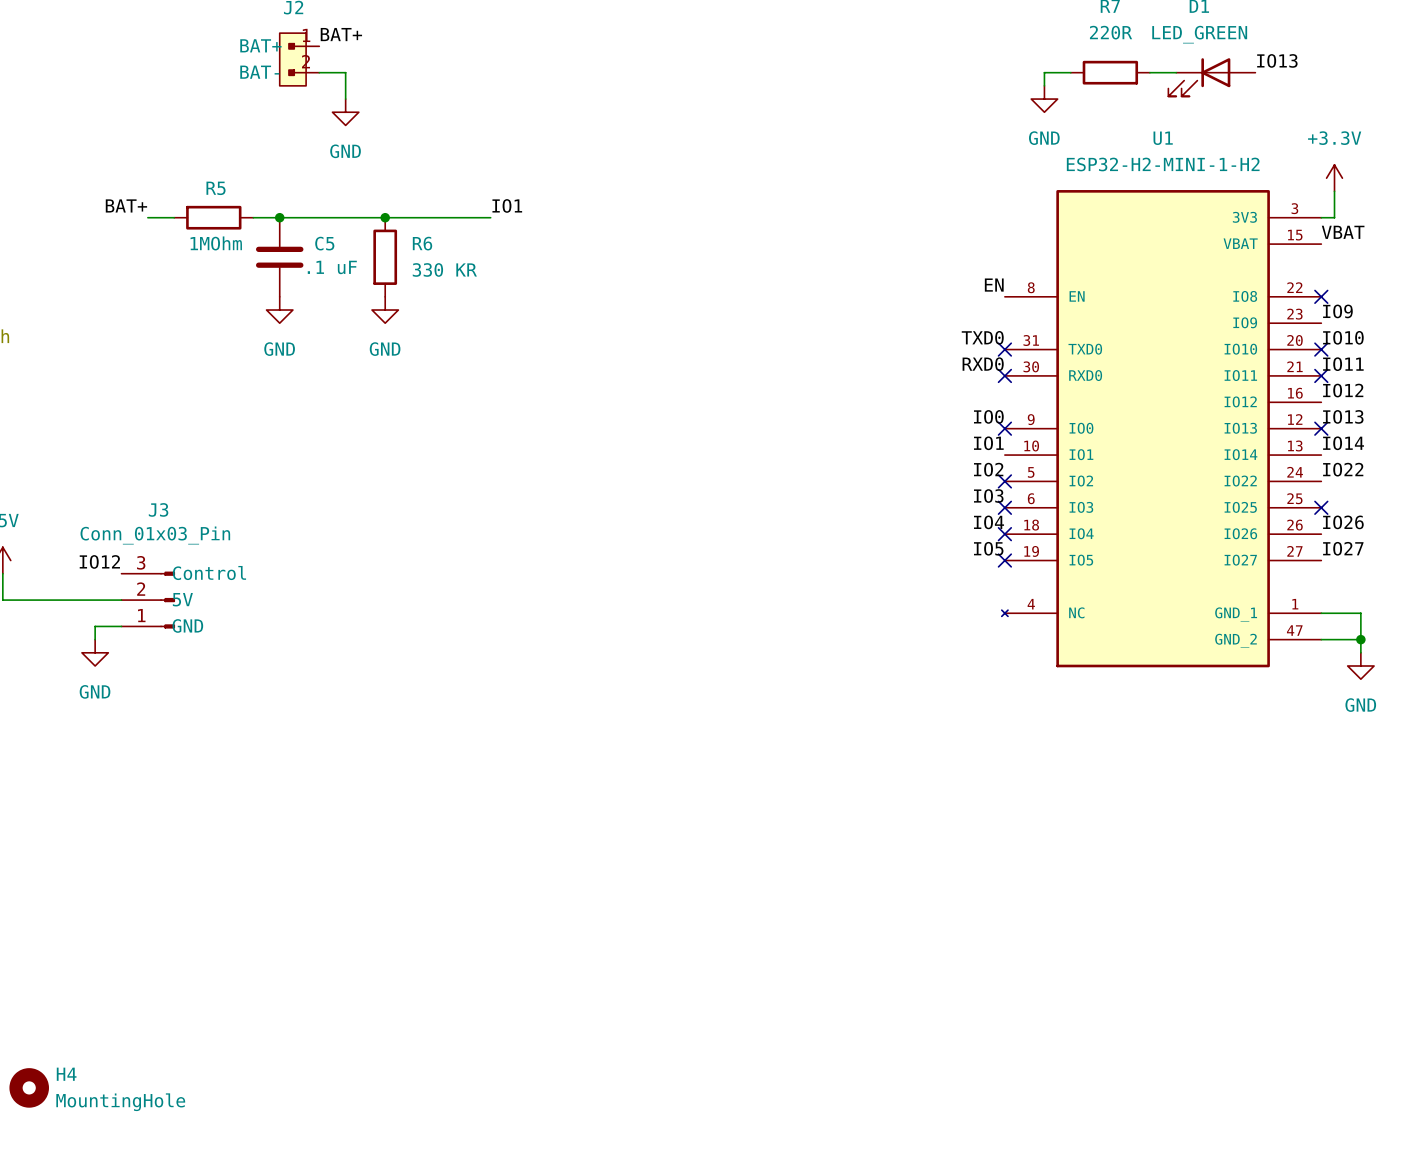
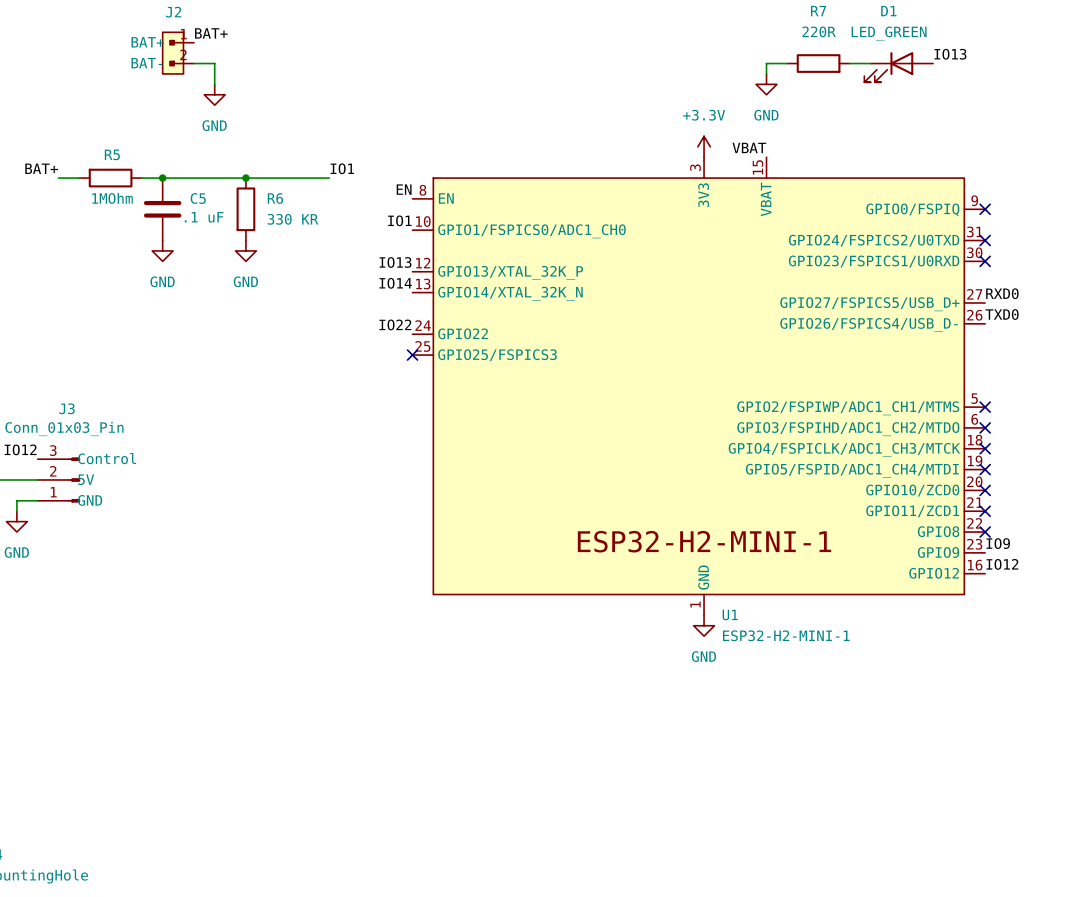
U1 name position: U1 (1163, 138) -> U1 (730, 615)
U1 value: ESP32-H2-MINI-1-H2 (1163, 164) -> ESP32-H2-MINI-1 (786, 635)
power symbol: none -> +3.3V (704, 146)
power symbol: +3.3V (1334, 178) -> none
label: none -> VBAT (749, 147)
U1 symbol: [1001, 190, 1322, 668] -> [412, 157, 986, 616]
wire: (1334, 191) (1334, 217) (1321, 217) -> none
label: none -> EN (404, 189)
label: VBAT (1343, 232) -> none
no-connect mark: none -> (985, 209)
label: none -> IO1 (399, 220)
label: EN (994, 285) -> none
label: IO9 (1337, 311) -> none
no-connect mark: none -> (985, 261)
label: none -> IO13 (395, 262)
label: TXD0 (982, 337) -> none
label: IO10 (1343, 337) -> none
no-connect mark: (1004, 349) -> none
no-connect mark: (1321, 349) -> none
label: none -> IO14 (395, 283)
label: RXD0 (983, 364) -> none
label: IO11 (1343, 364) -> RXD0 (1002, 293)
no-connect mark: (1004, 375) -> none
no-connect mark: (1321, 375) -> none
label: IO12 (1343, 390) -> TXD0 (1002, 314)
label: none -> IO22 (395, 324)
label: IO0 (988, 416) -> none
label: IO13 (1343, 416) -> none
no-connect mark: (1004, 428) -> none
no-connect mark: (1321, 428) -> none
no-connect mark: none -> (412, 355)
label: IO1 (988, 443) -> none
label: IO14 (1343, 443) -> none
label: IO2 (988, 469) -> none
label: IO22 (1343, 469) -> none
no-connect mark: (1004, 481) -> none
label: IO3 (988, 496) -> none
no-connect mark: (1004, 507) -> none
label: IO4 (989, 522) -> none
label: IO26 (1343, 522) -> none
no-connect mark: (1004, 534) -> none
no-connect mark: none -> (985, 427)
label: IO5 (988, 548) -> none
label: IO27 (1343, 548) -> none
no-connect mark: (1004, 560) -> none
no-connect mark: none -> (985, 448)
no-connect mark: none -> (985, 469)
wire: (1321, 613) (1360, 613) (1360, 652) -> none
no-connect mark: none -> (985, 490)
wire: (1321, 639) (1360, 639) -> none
no-connect mark: none -> (985, 511)
junction: (1360, 639) -> none
no-connect mark: none -> (985, 532)
power symbol: GND (1360, 666) -> none
label: none -> IO9 (998, 543)
label: none -> IO12 (1002, 564)
power symbol: none -> GND (704, 625)

